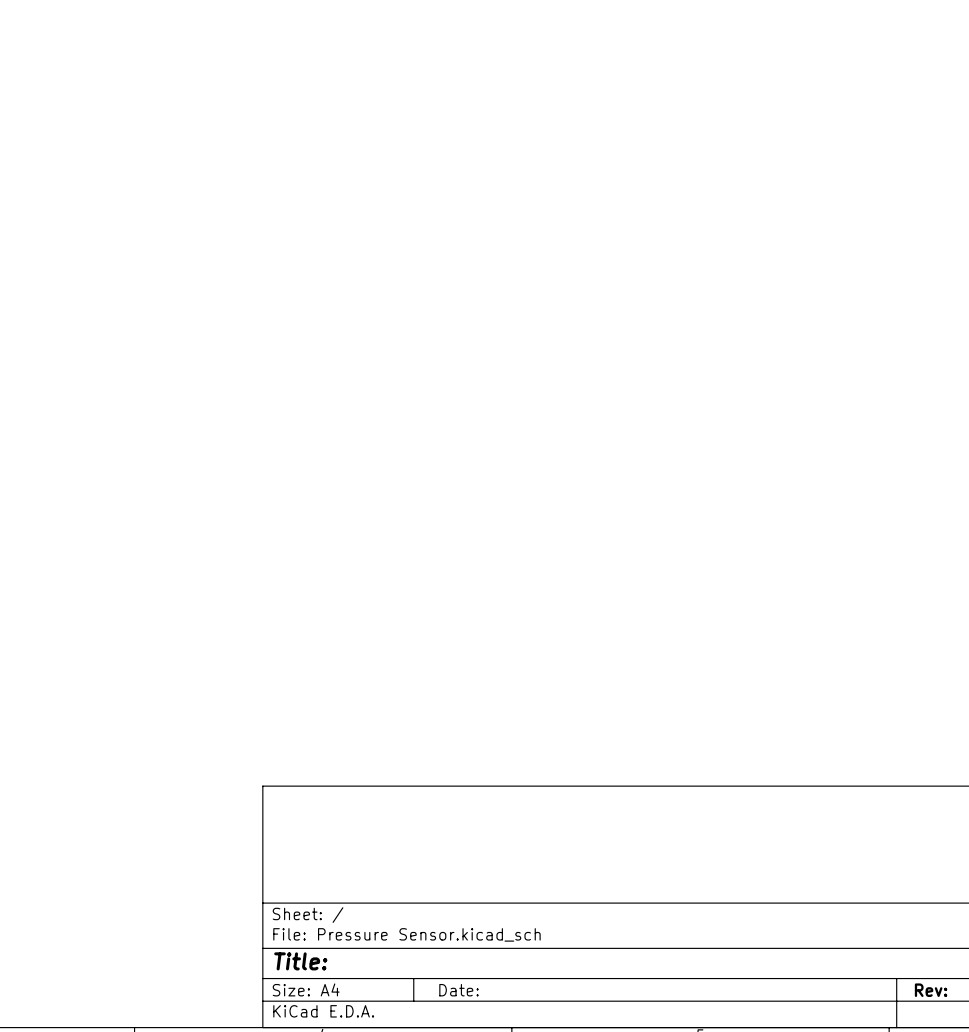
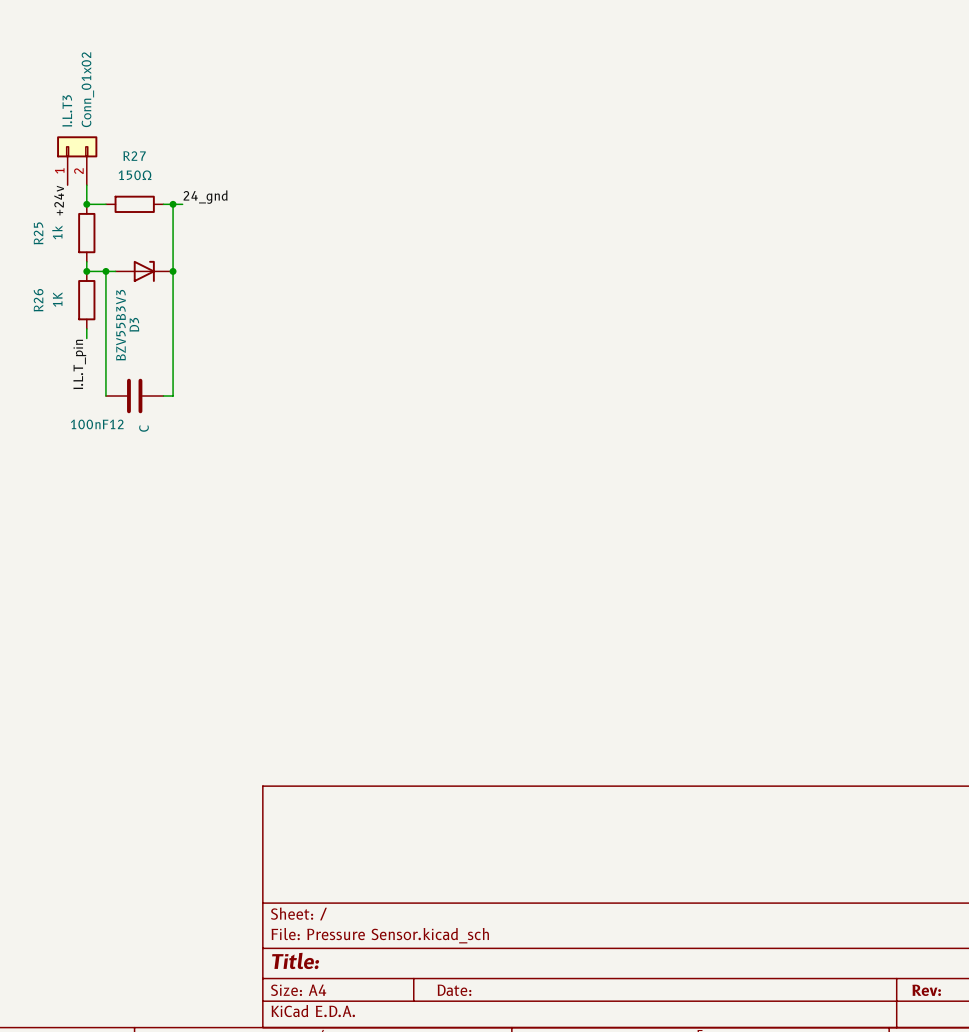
I.L.T3: none -> Conn_01x02 (77, 160)
wire: none -> (86, 185) (86, 204) (105, 204)
label: none -> 24_gnd (205, 197)
label: none -> +24v (59, 200)
junction: none -> (86, 204)
R27: none -> 150Ω (134, 204)
wire: none -> (163, 204) (182, 204)
wire: none -> (173, 204) (173, 396) (163, 396)
junction: none -> (173, 204)
R25: none -> 1k (86, 233)
wire: none -> (86, 261) (86, 271) (115, 271)
junction: none -> (86, 271)
wire: none -> (105, 271) (105, 396)
junction: none -> (105, 271)
D3: none -> BZV55B3V3 (144, 271)
junction: none -> (173, 271)
R26: none -> 1K (86, 300)
wire: none -> (86, 328) (86, 338)
label: none -> I.L.T_pin (79, 364)
100nF12: none -> C (134, 396)

